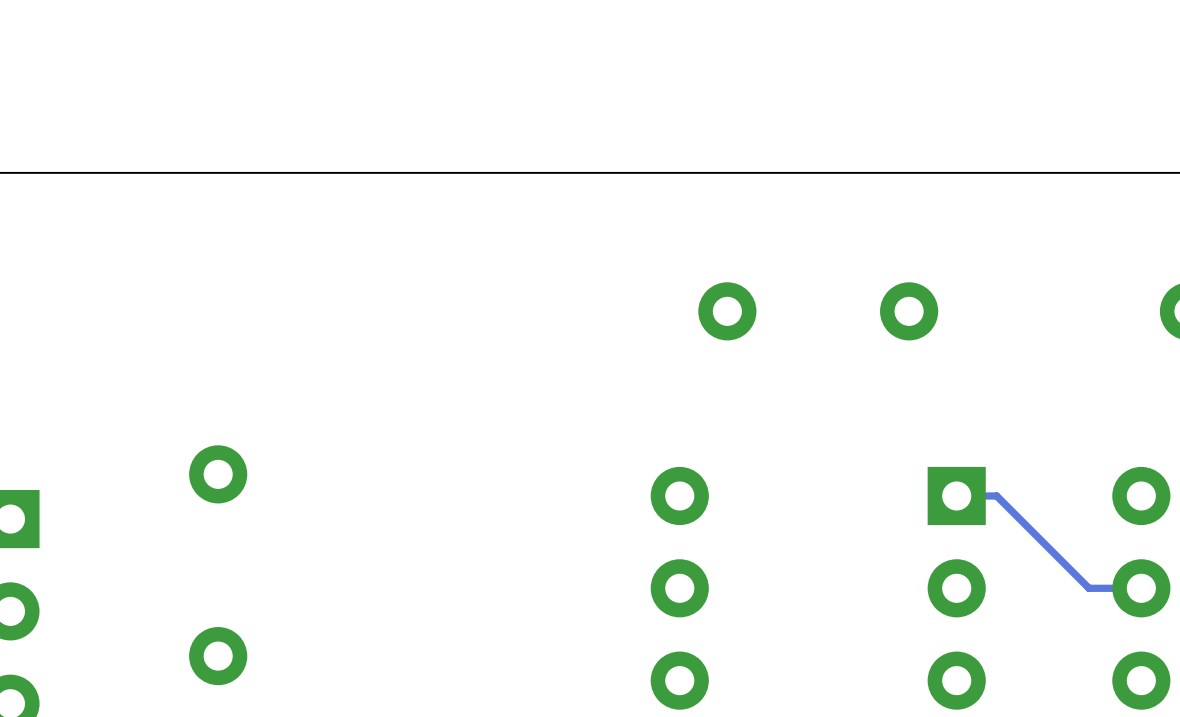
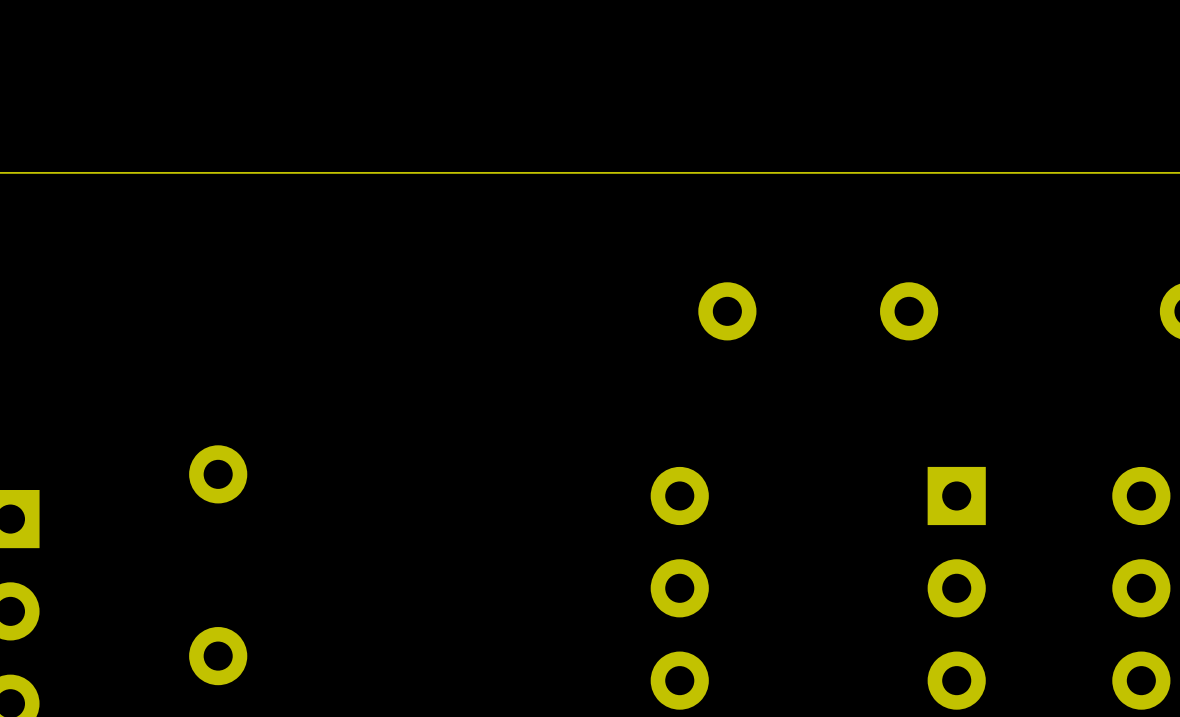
track: (956, 495) (996, 495) (1089, 588) (1141, 588) -> none

